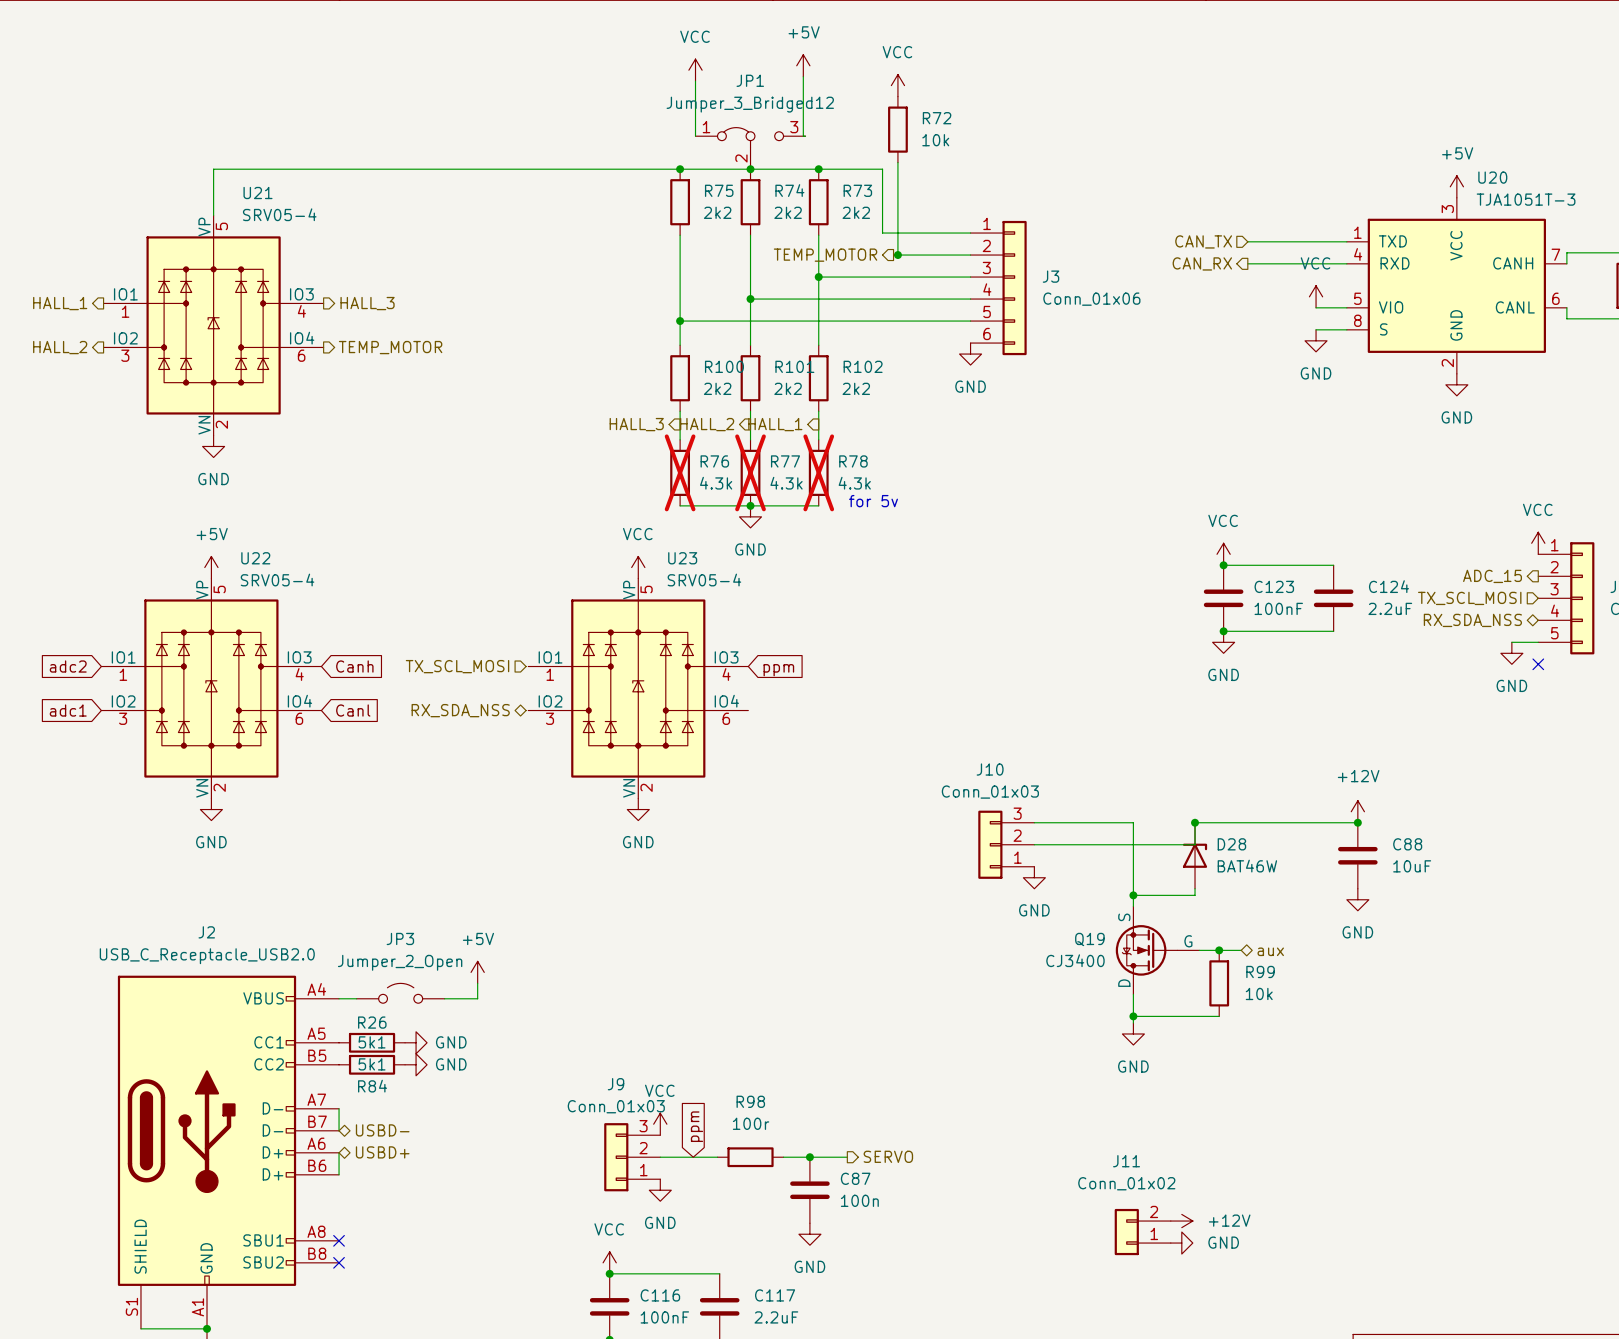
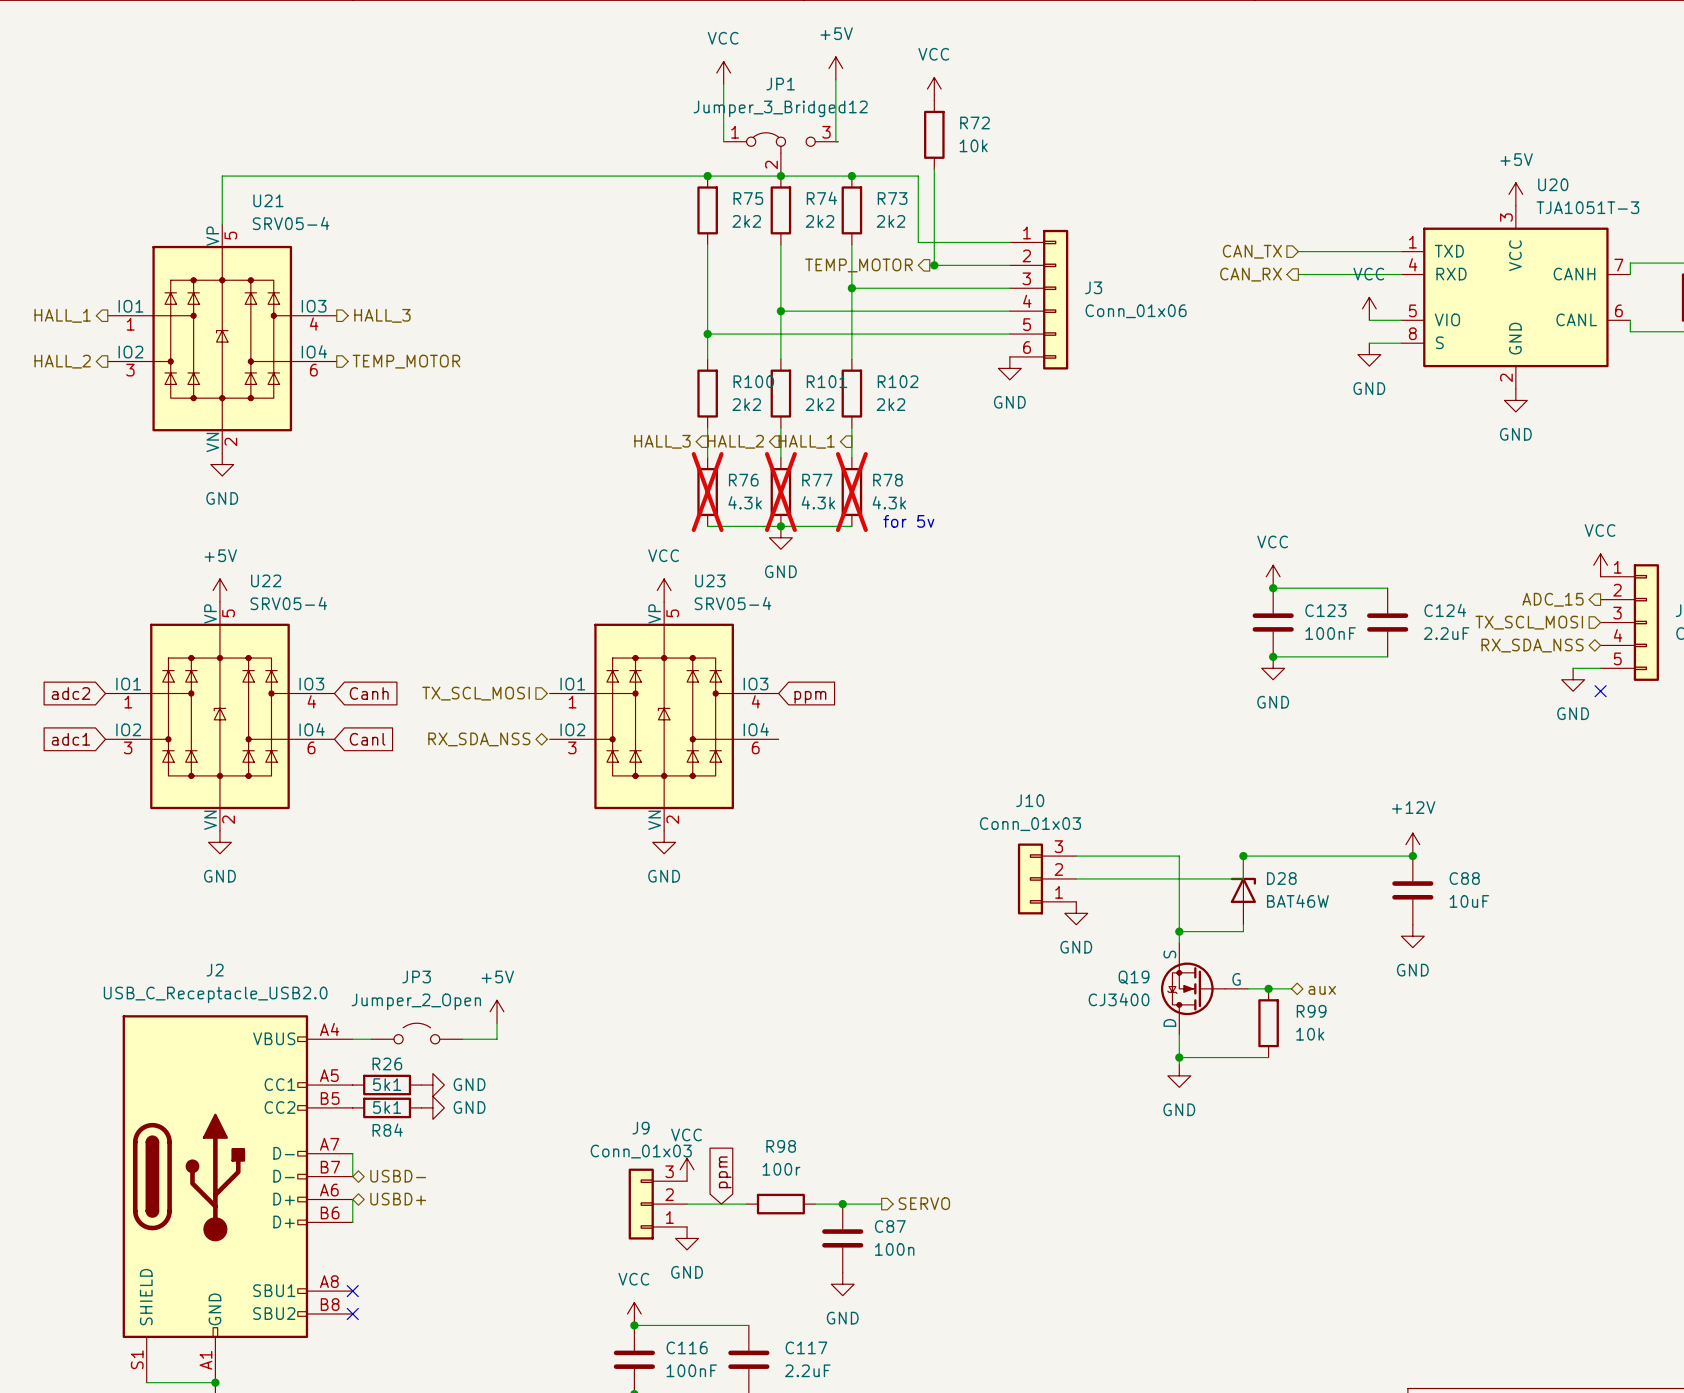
power symbol: +12V (1181, 1221) -> none
J11: Conn_01x02 (1142, 1232) -> none
power symbol: GND (1181, 1243) -> none

